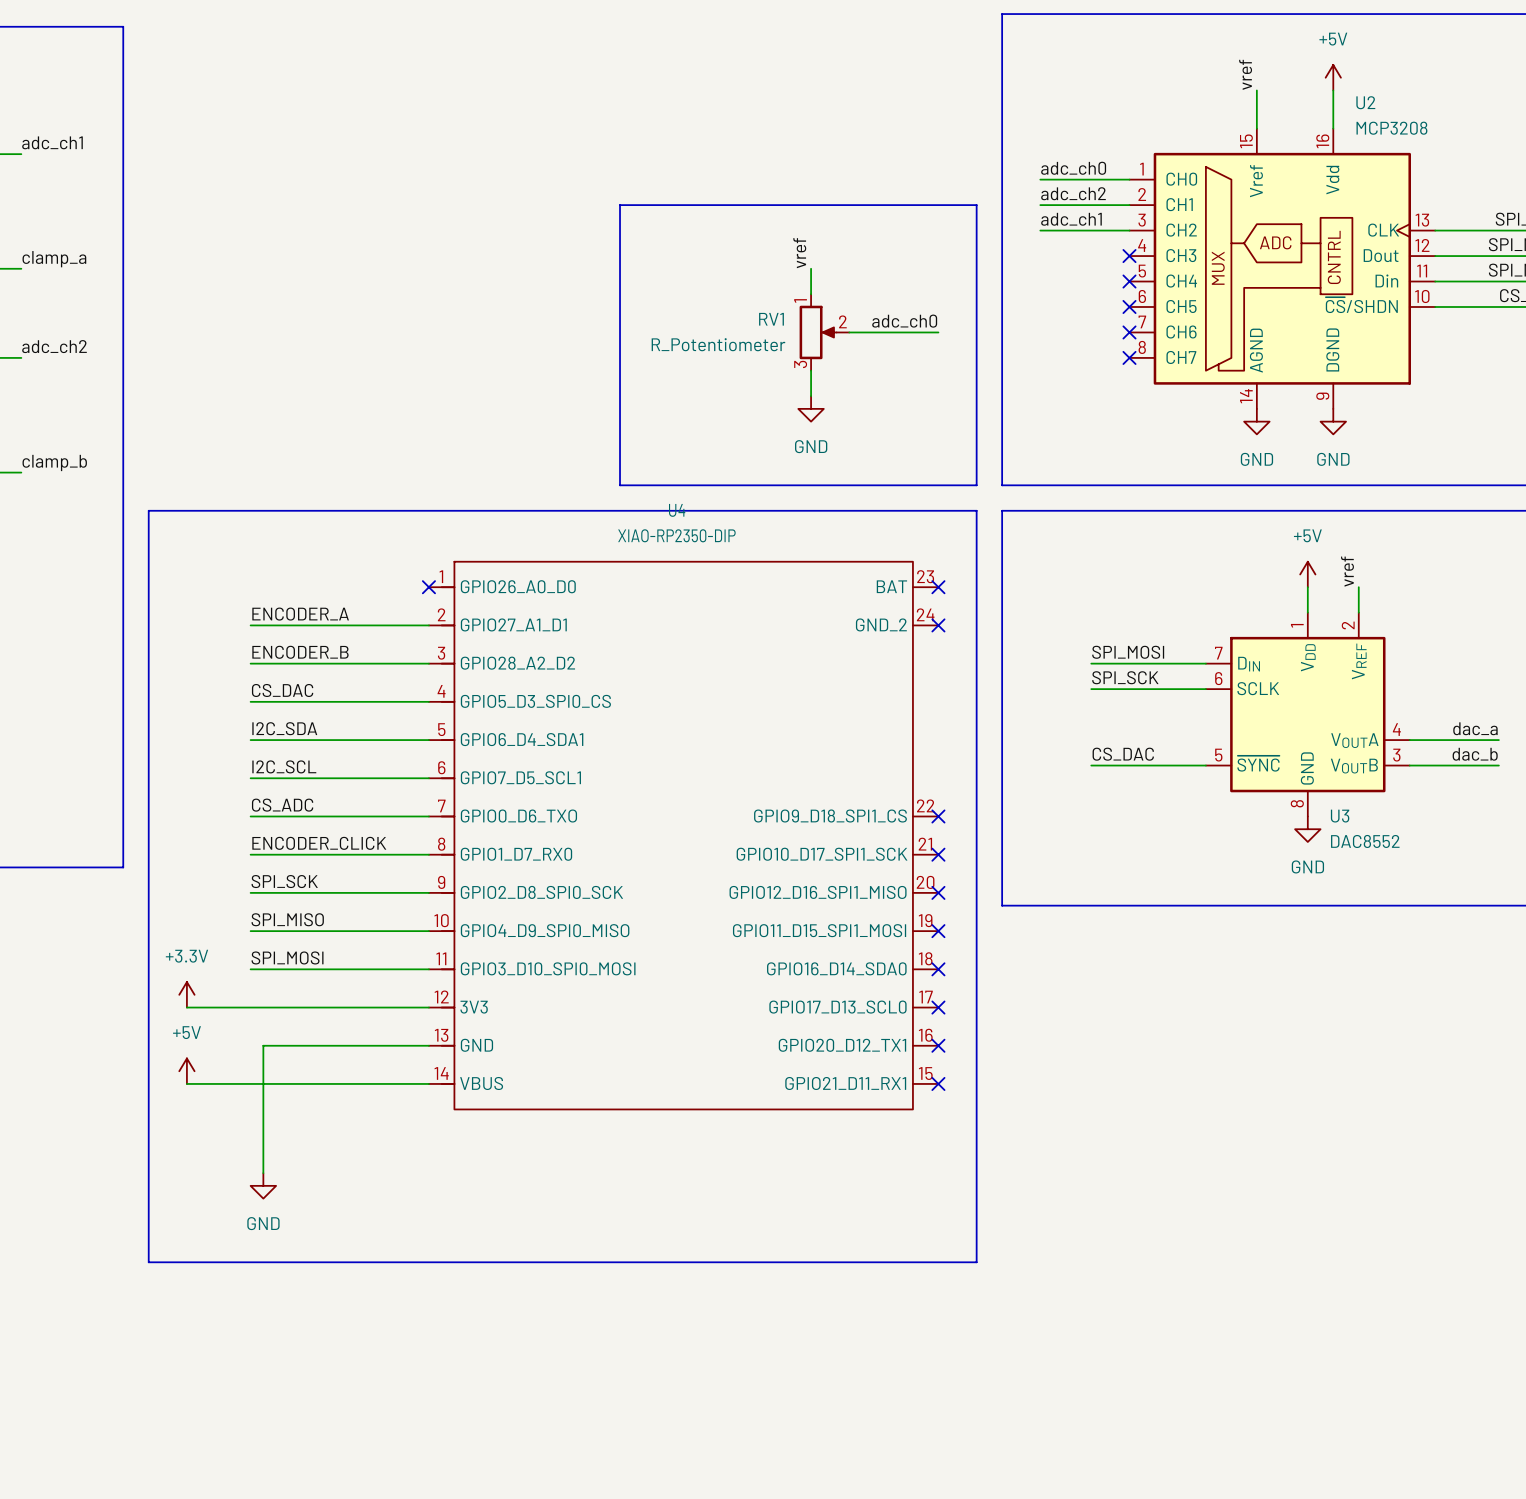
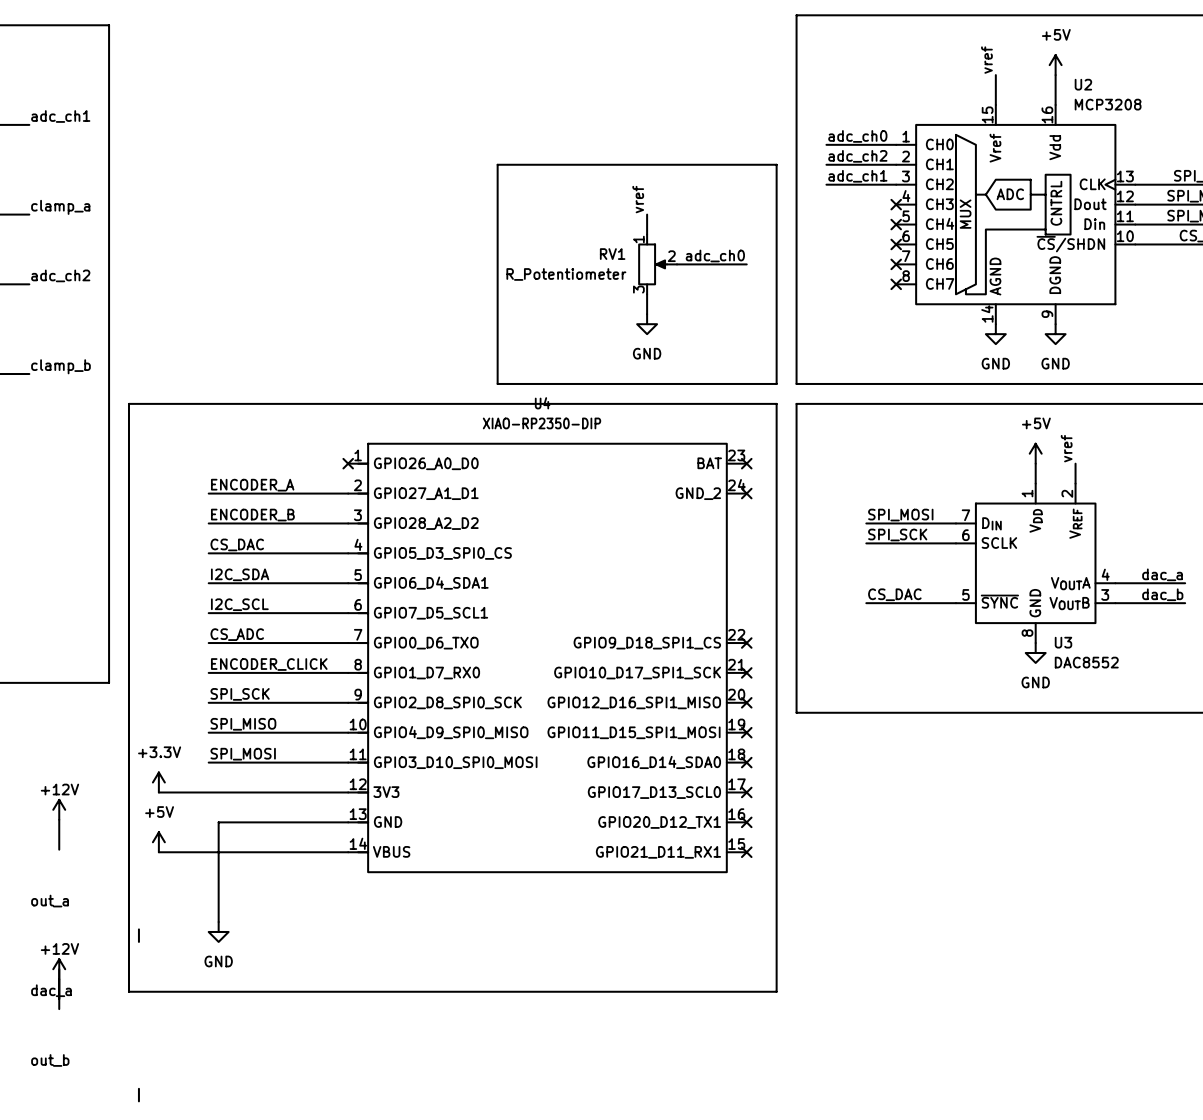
power symbol: none -> +12V (59, 809)
wire: none -> (59, 819) (59, 849)
label: none -> out_a (50, 901)
wire: none -> (138, 929) (138, 941)
wire: none -> (59, 969) (59, 1009)
power symbol: none -> +12V (59, 969)
label: none -> dac_a (51, 990)
label: none -> out_b (50, 1060)
wire: none -> (138, 1088) (138, 1101)

